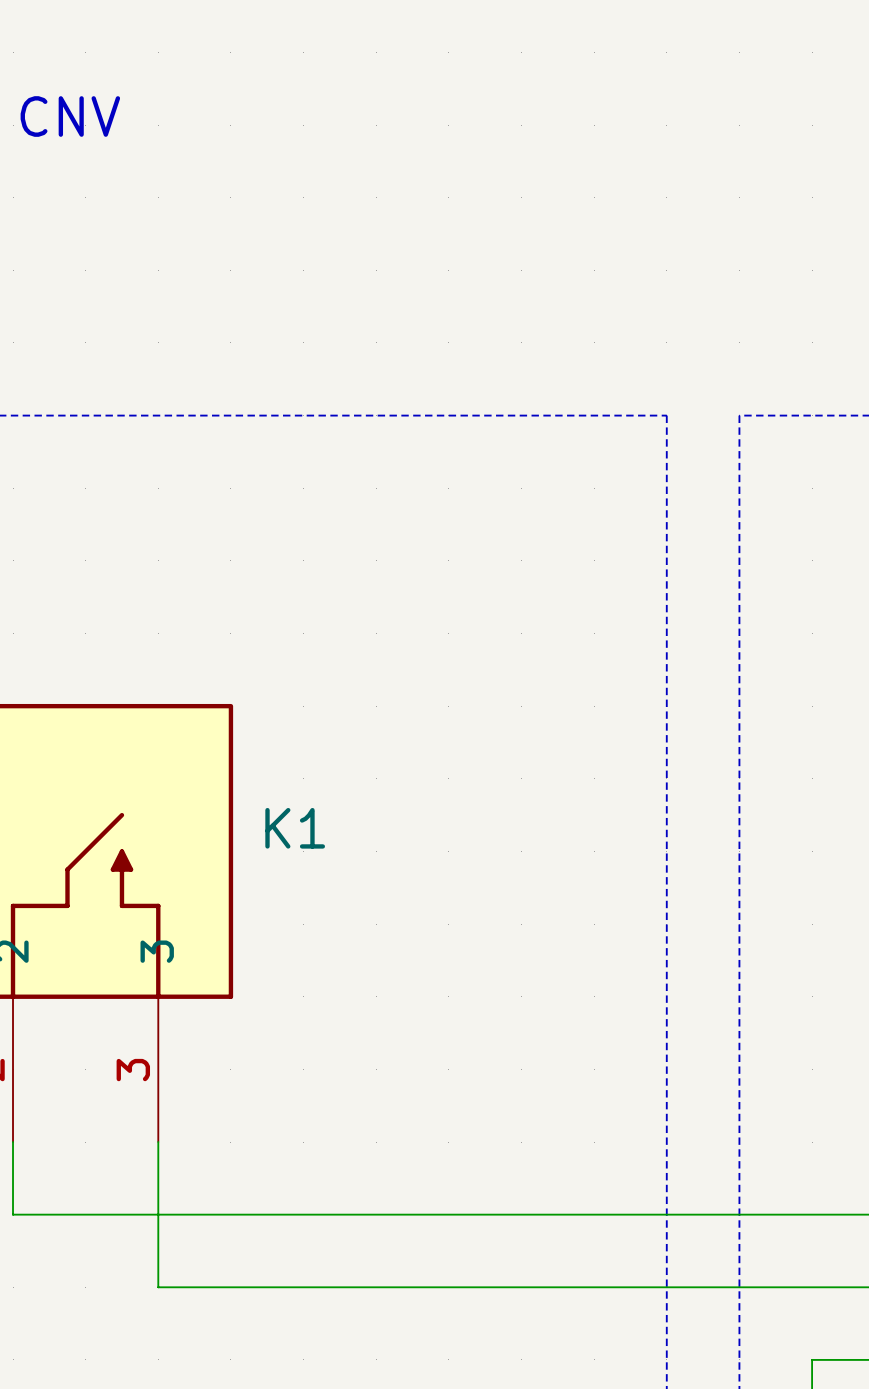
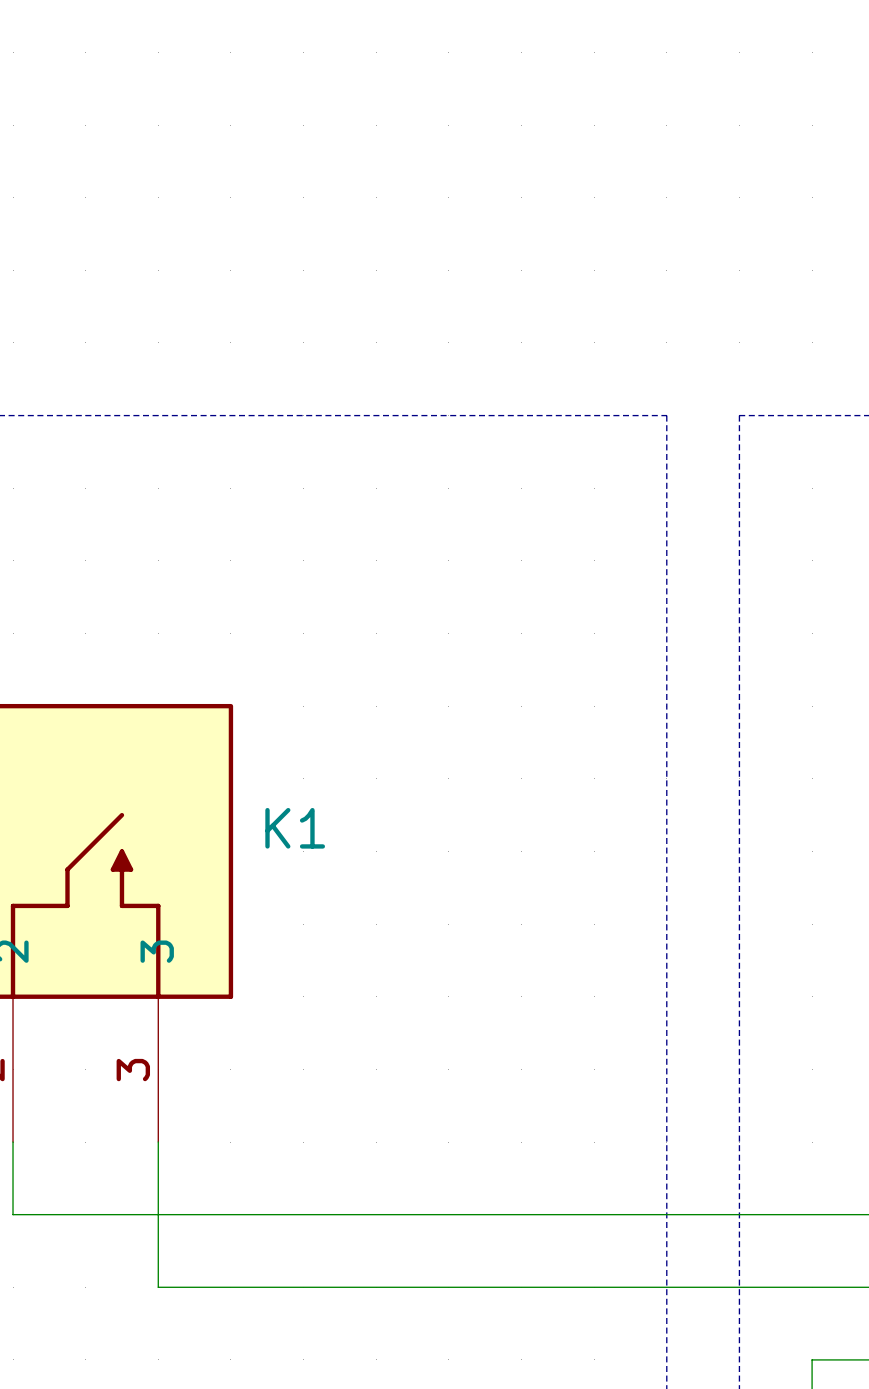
text: CNV (70, 116) -> none

